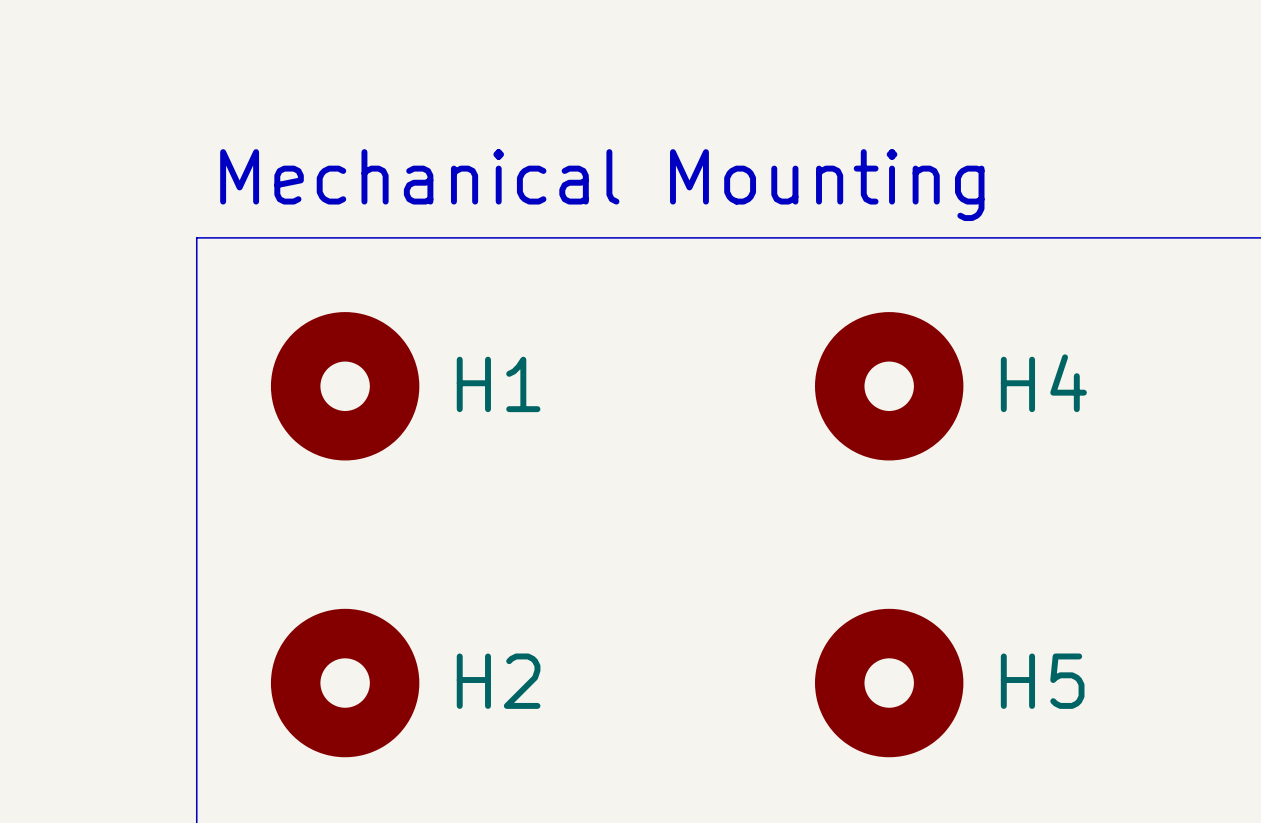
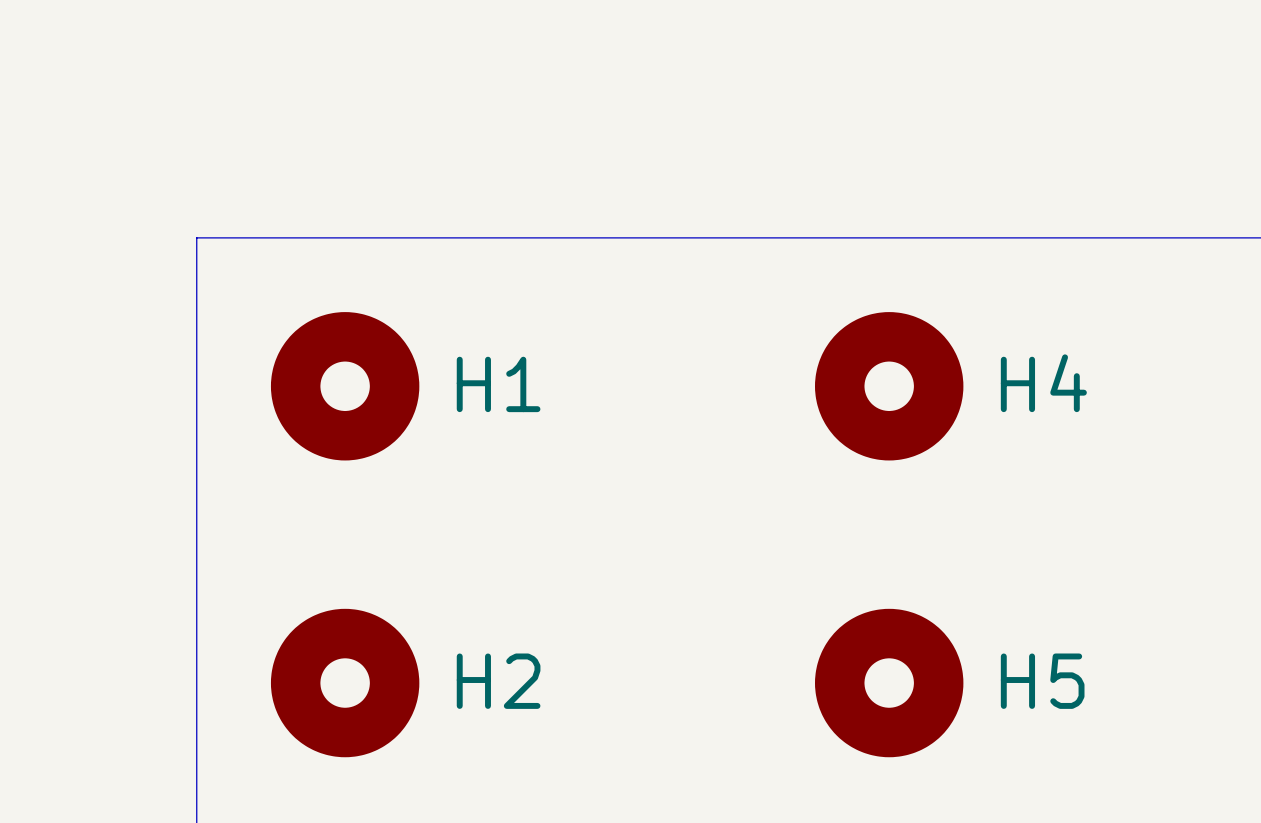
text: Mechanical Mounting (602, 185) -> none

